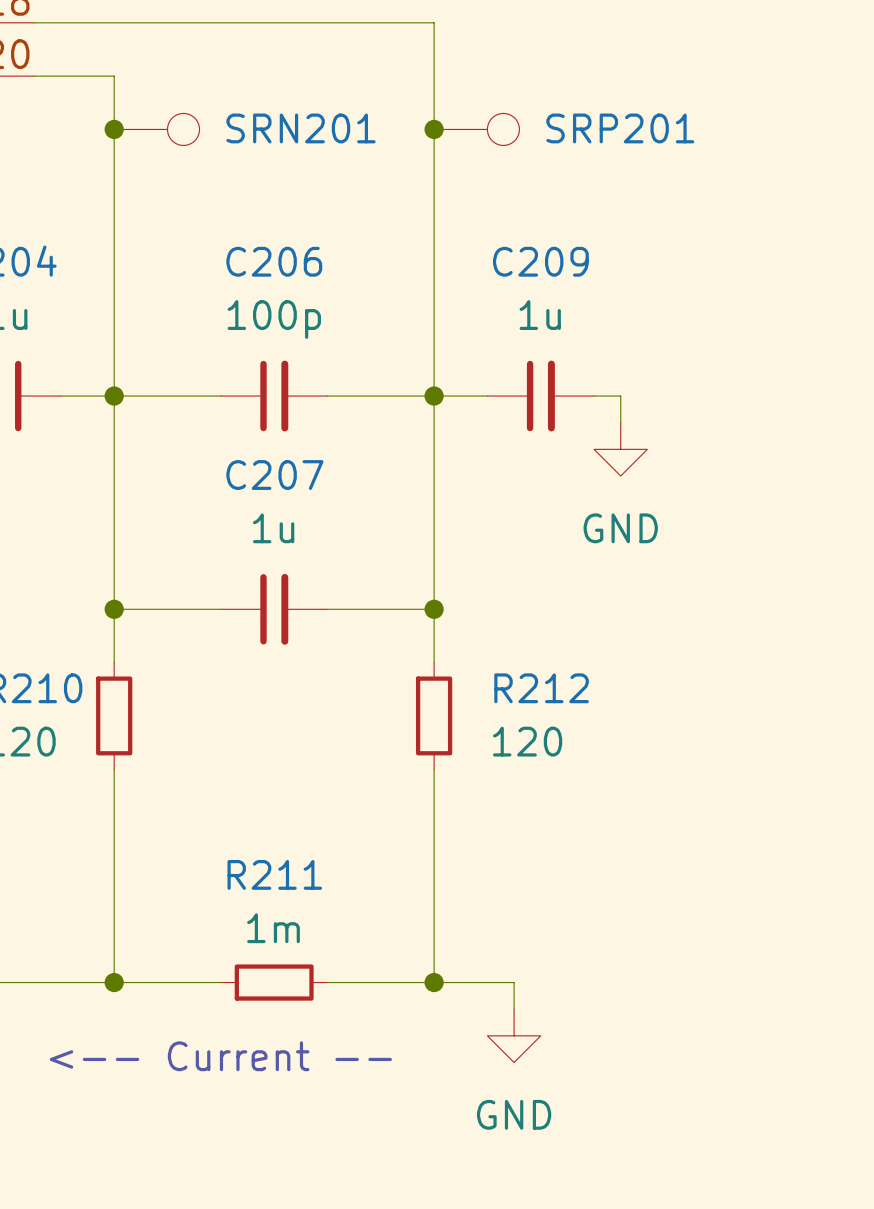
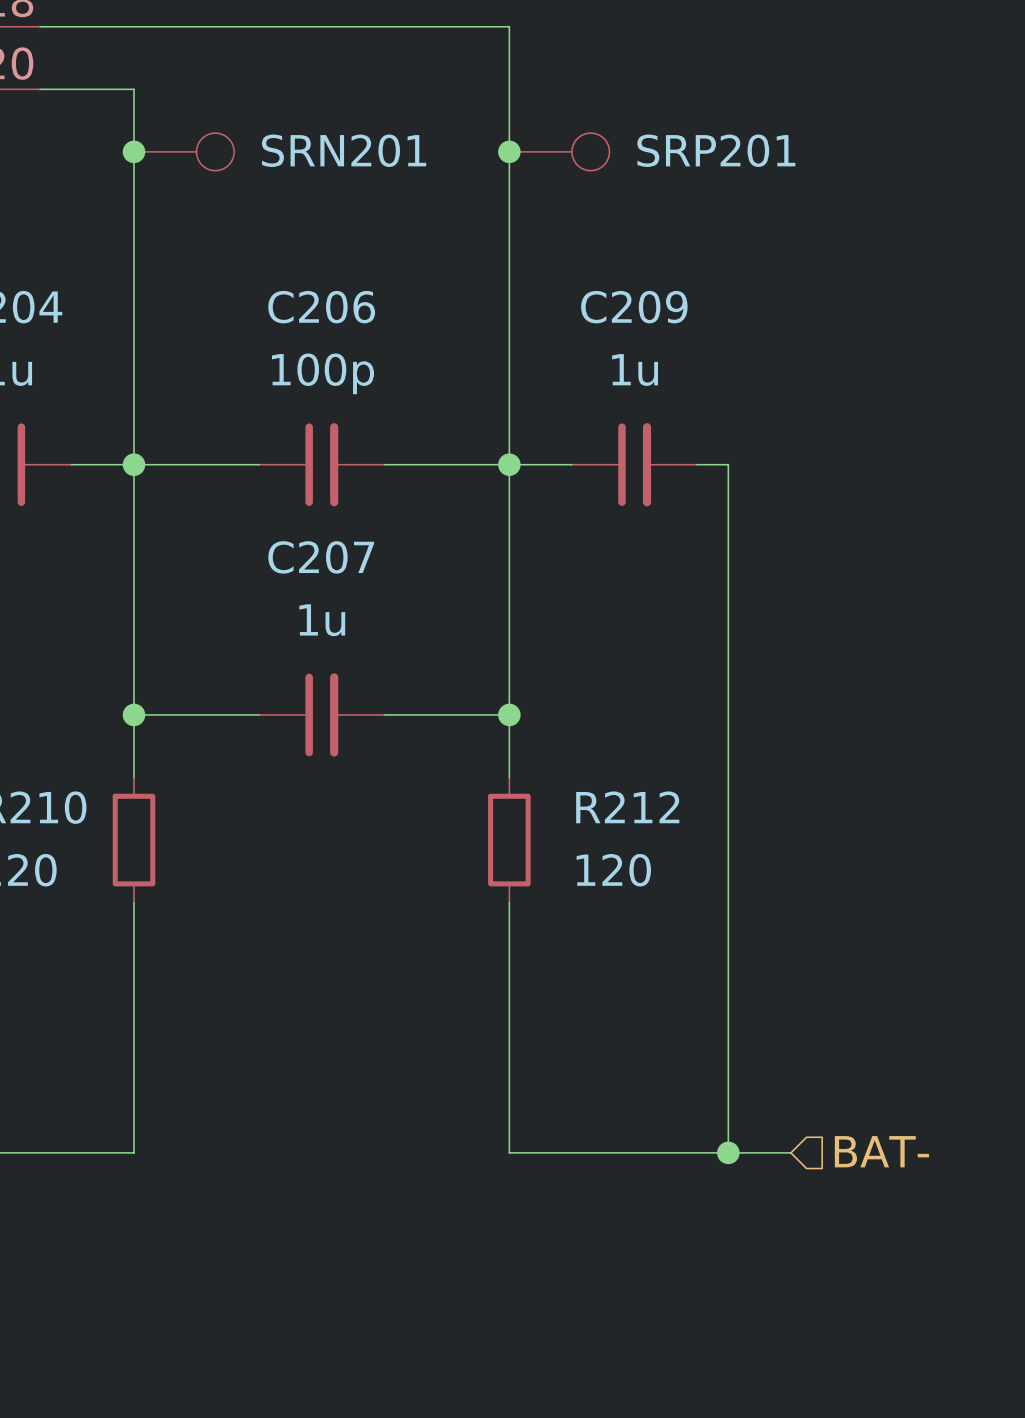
wire: none -> (728, 495) (728, 1152)
power symbol: GND (620, 449) -> none
hierarchical label: none -> BAT- (881, 1151)
wire: (114, 982) (220, 982) -> none
junction: (114, 982) -> none
R211: 1m (274, 982) -> none
wire: (327, 982) (434, 982) -> none
junction: (434, 982) -> none
wire: (514, 982) (514, 1009) -> (603, 1152) (790, 1152)
junction: none -> (728, 1152)
power symbol: GND (514, 1035) -> none
text: <-- Current -- (220, 1056) -> none

